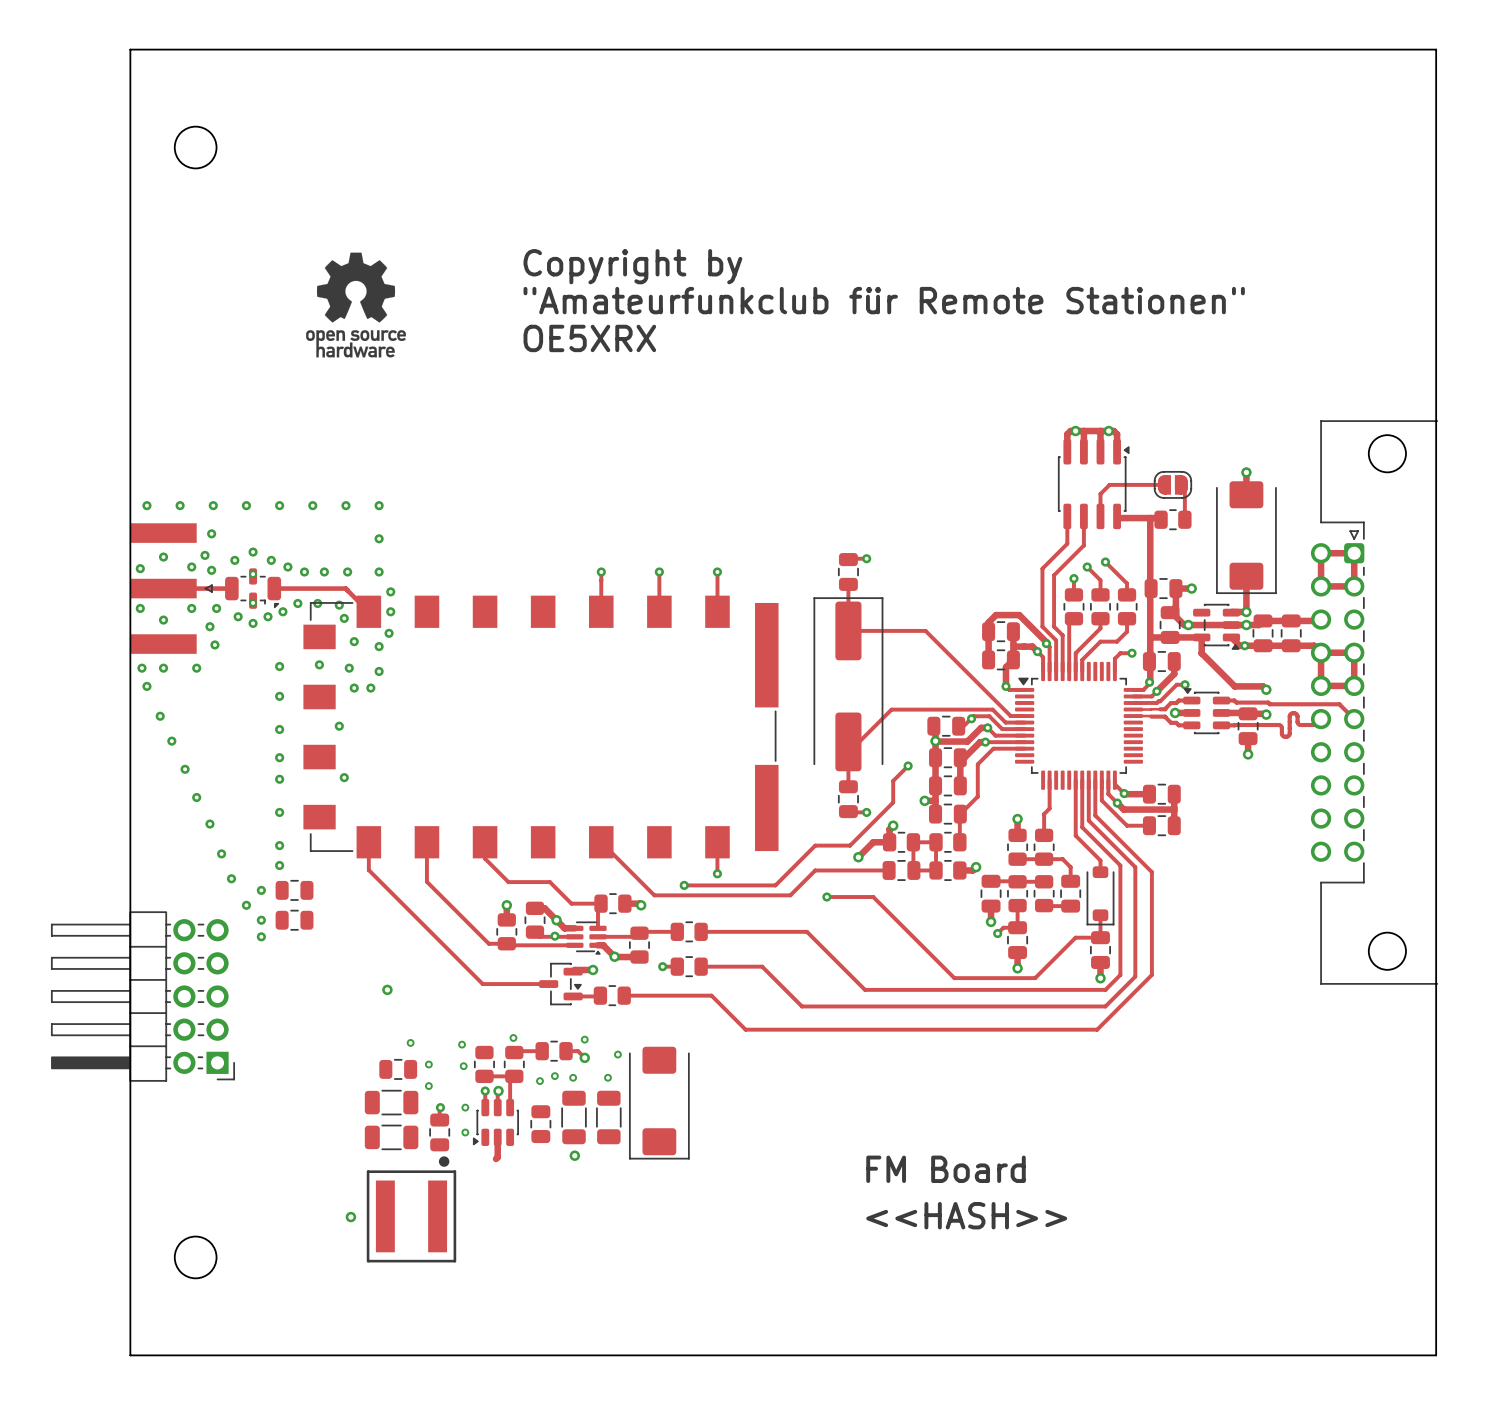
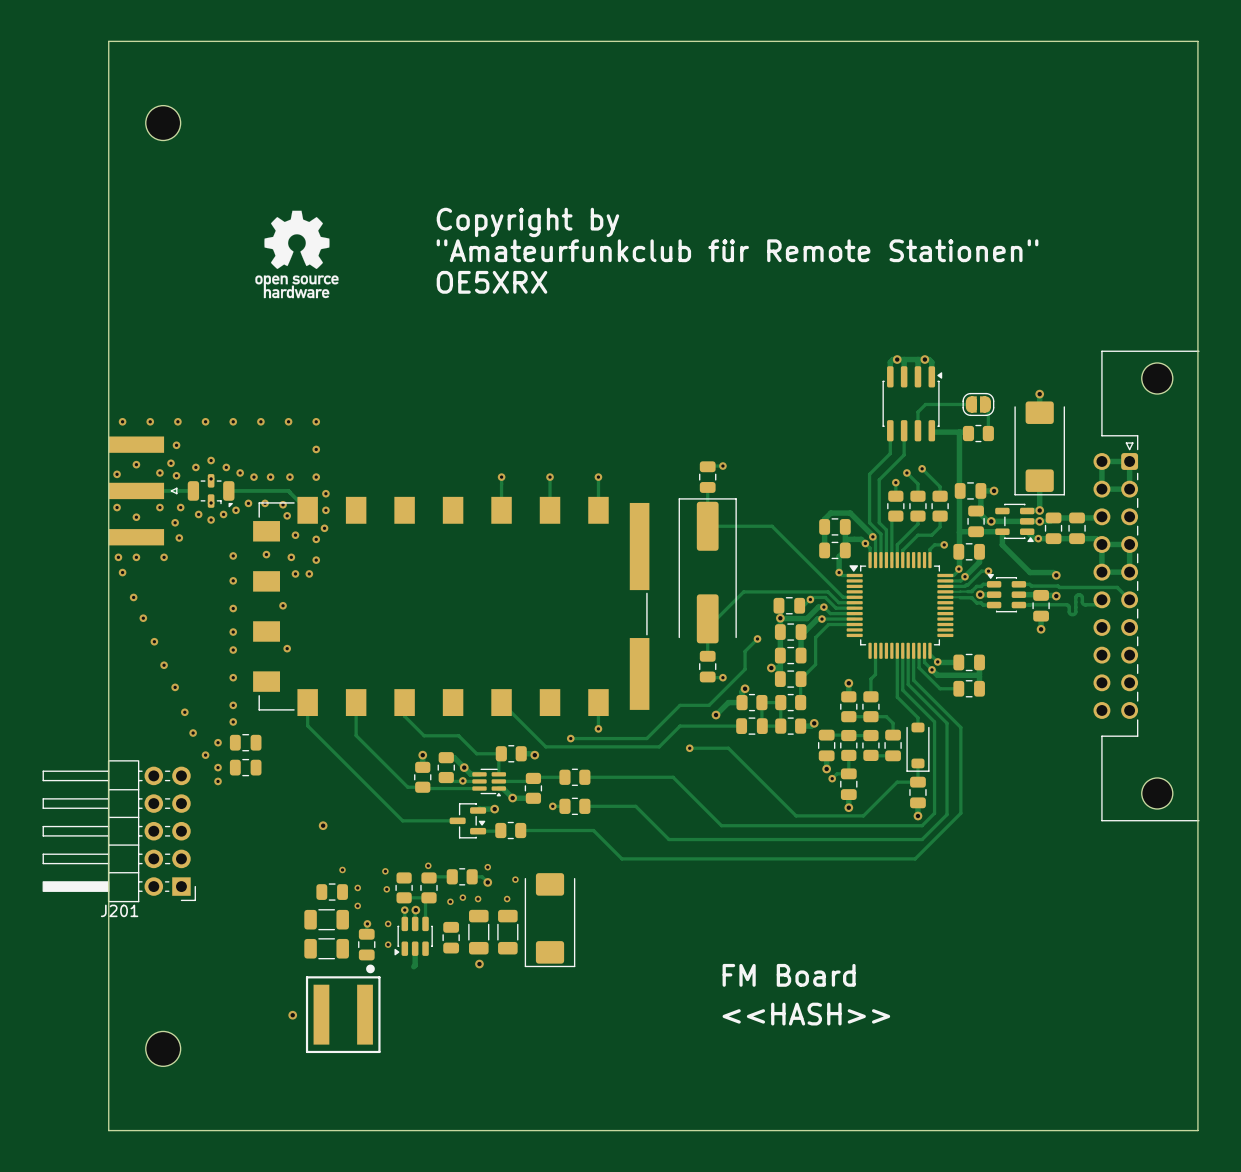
J201 name: none -> J201 (119, 910)

